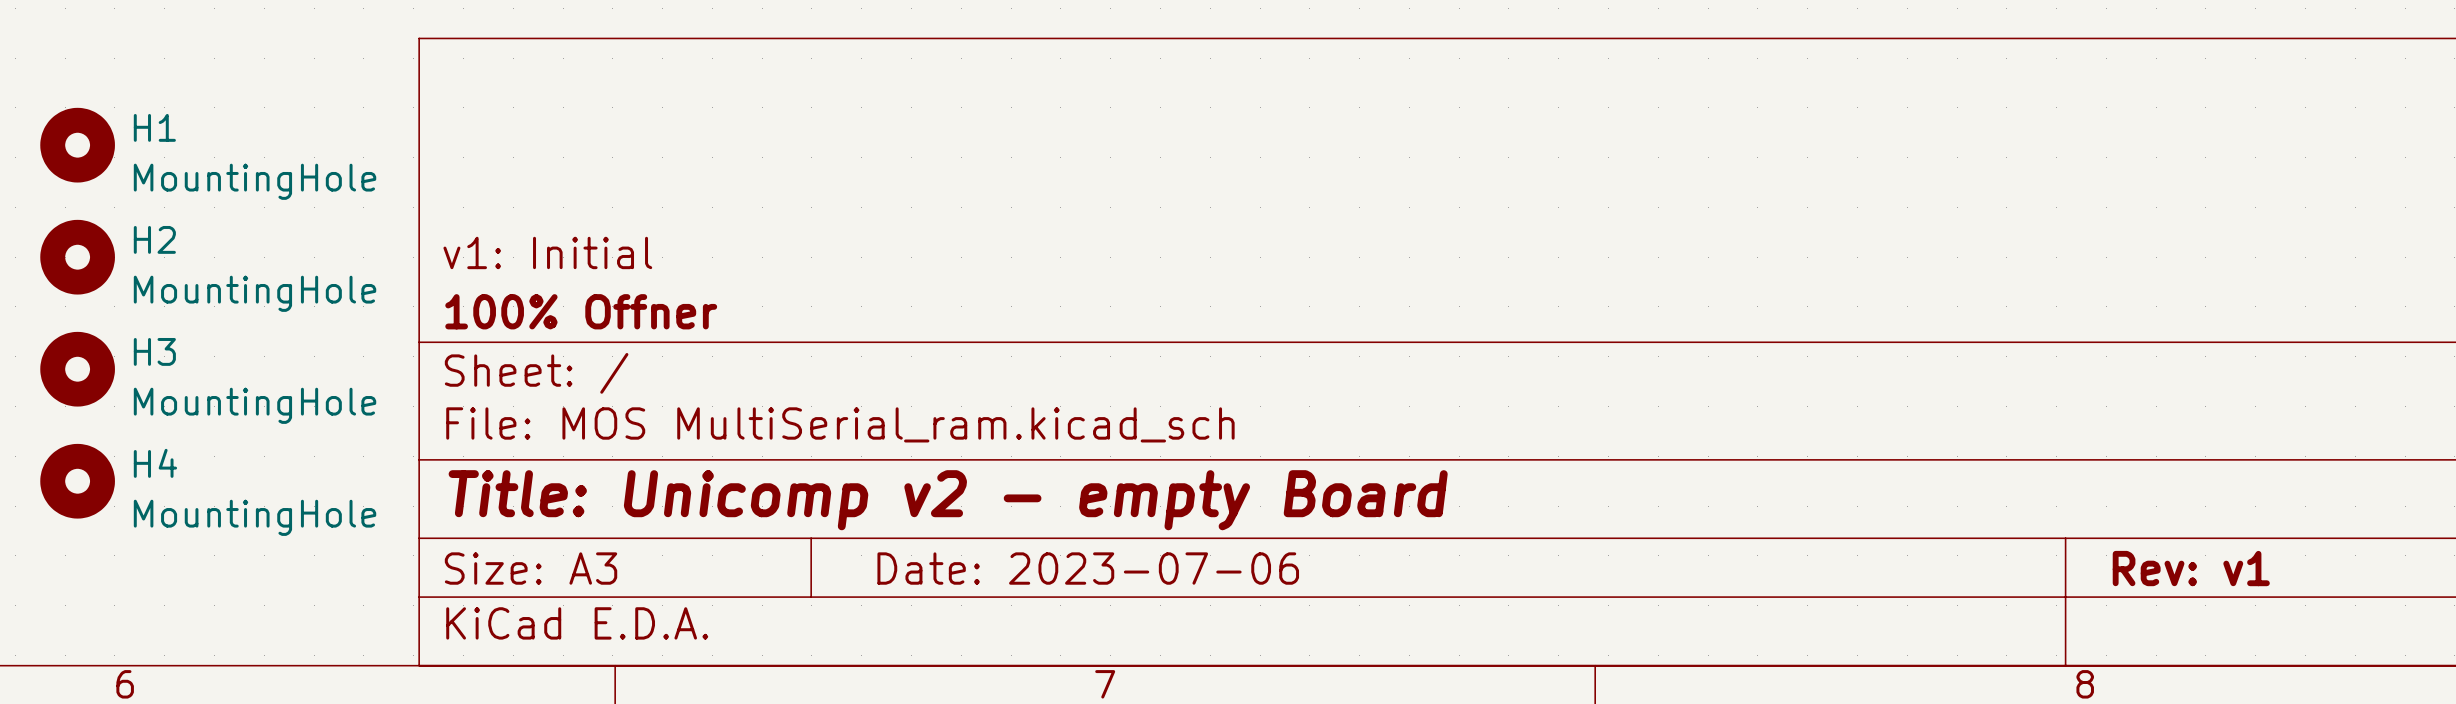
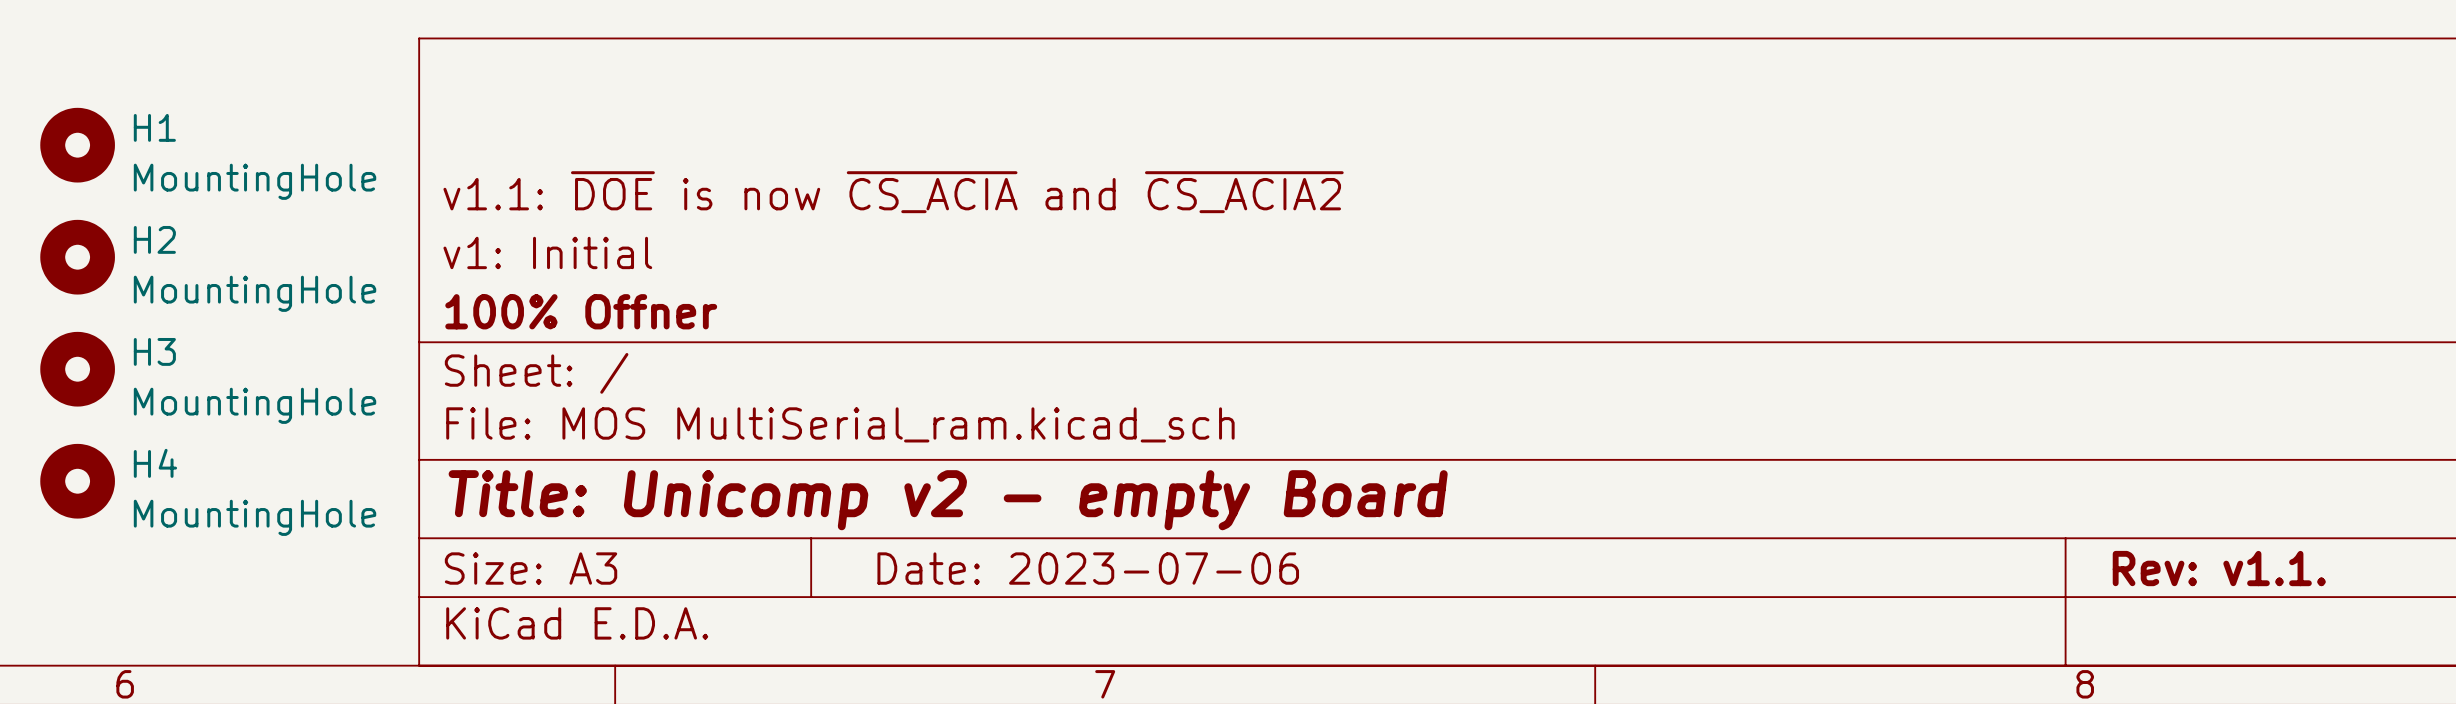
title block: none -> v1.1: ~{DOE} is now ~{CS_ACIA} and ~{CS_ACIA2} (893, 192)
title block: Rev: v1 (2191, 568) -> Rev: v1.1. (2219, 568)

